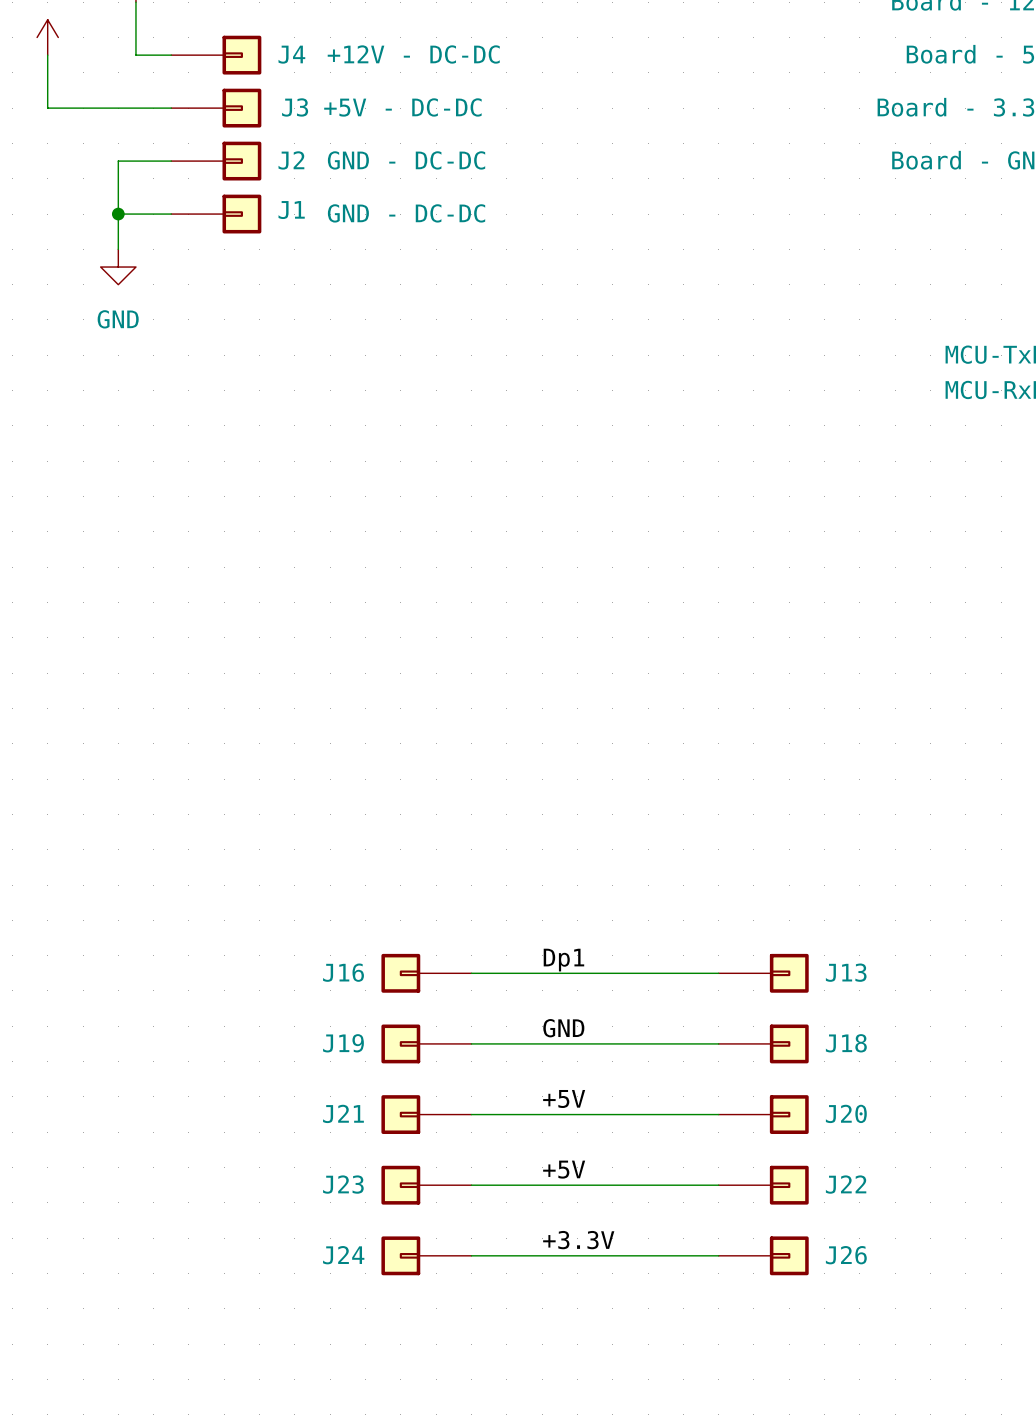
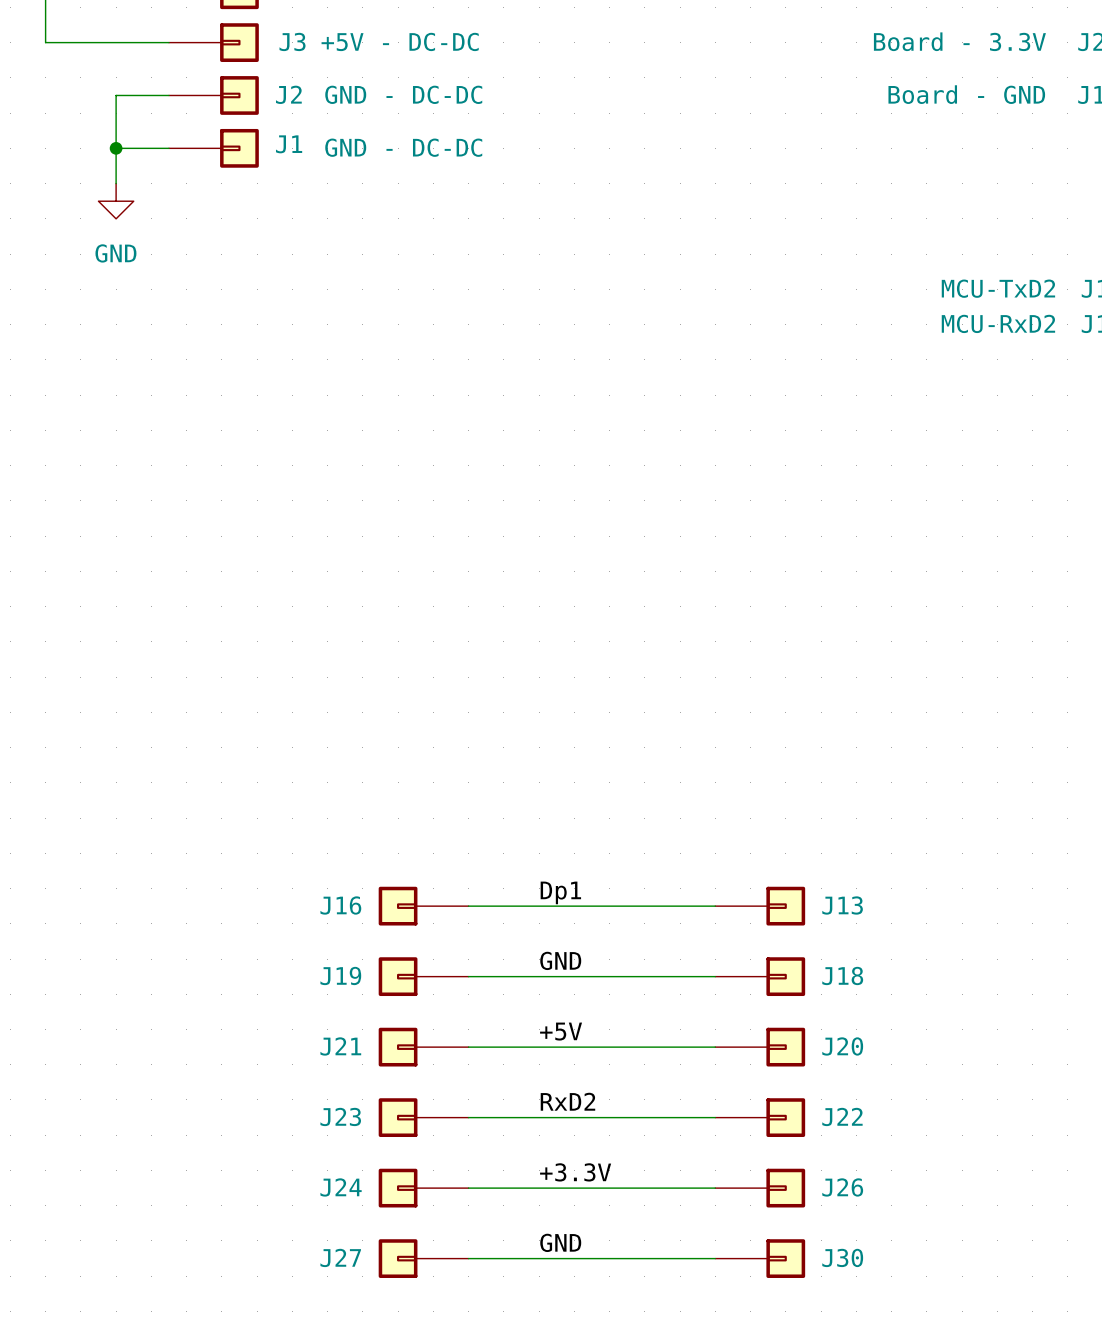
label: +5V (564, 1169) -> RxD2 (567, 1101)
label: none -> GND (560, 1242)
J27: none -> (423, 1258)
wire: none -> (468, 1258) (715, 1258)
J30: none -> (760, 1258)

